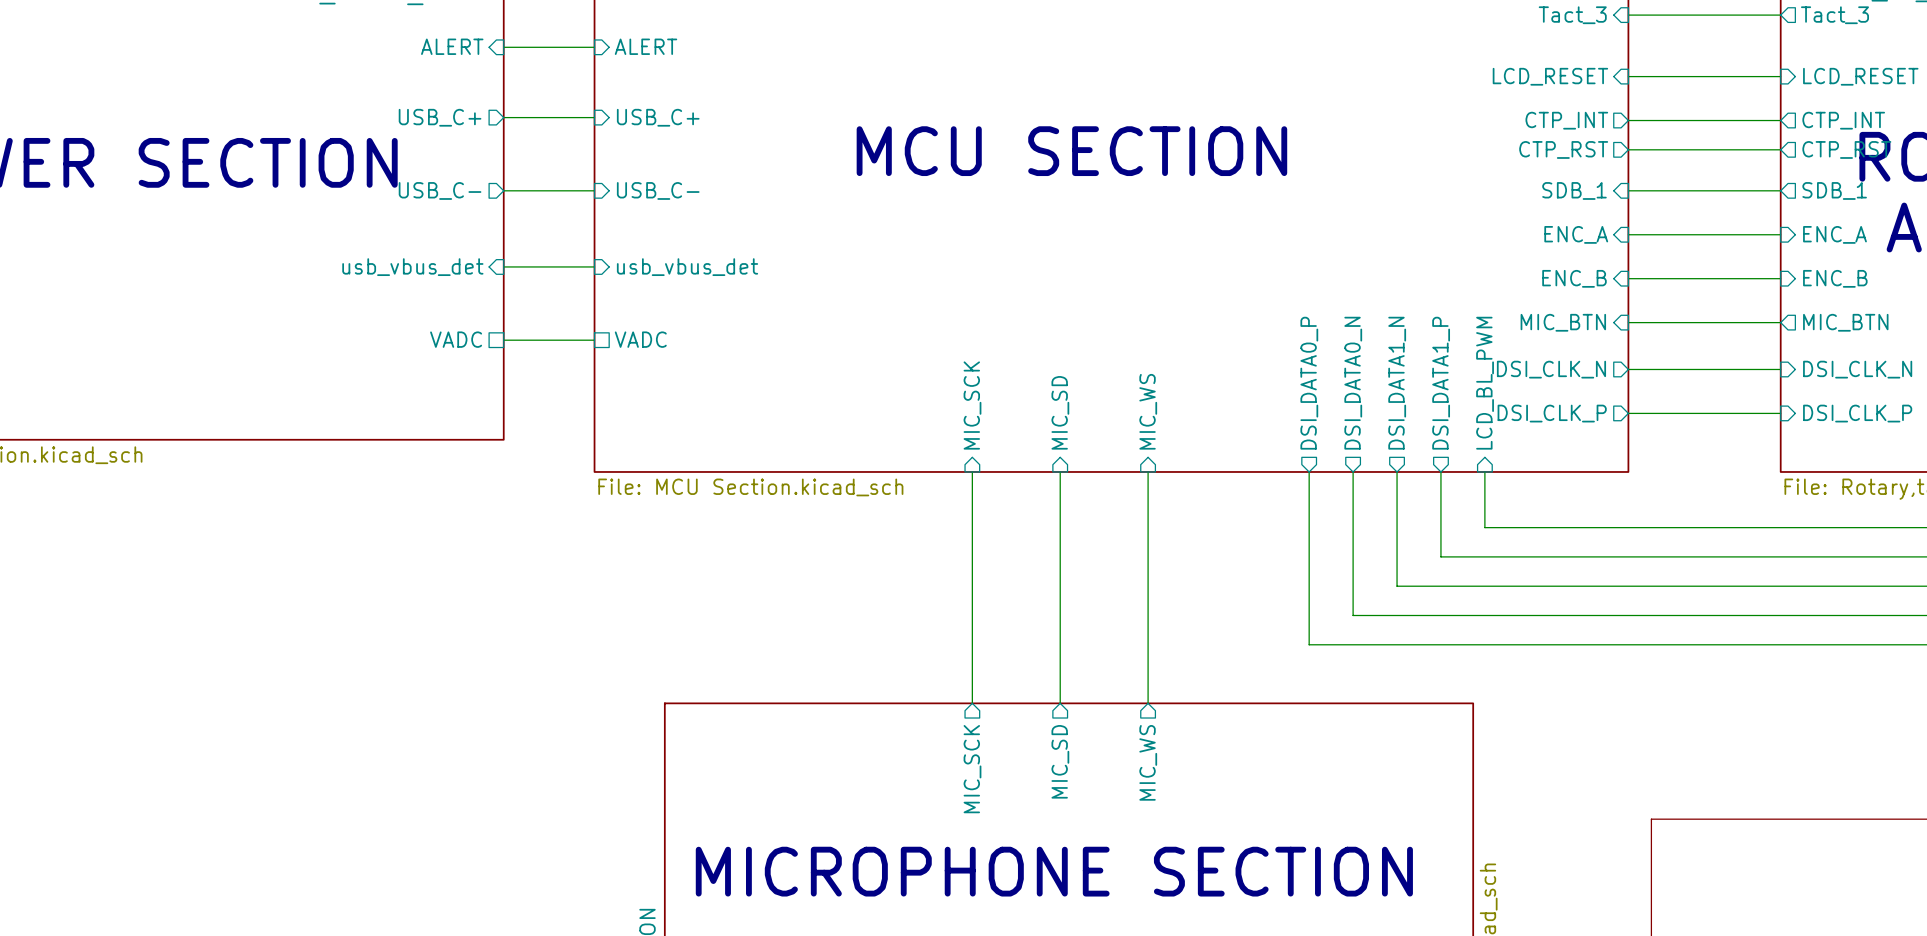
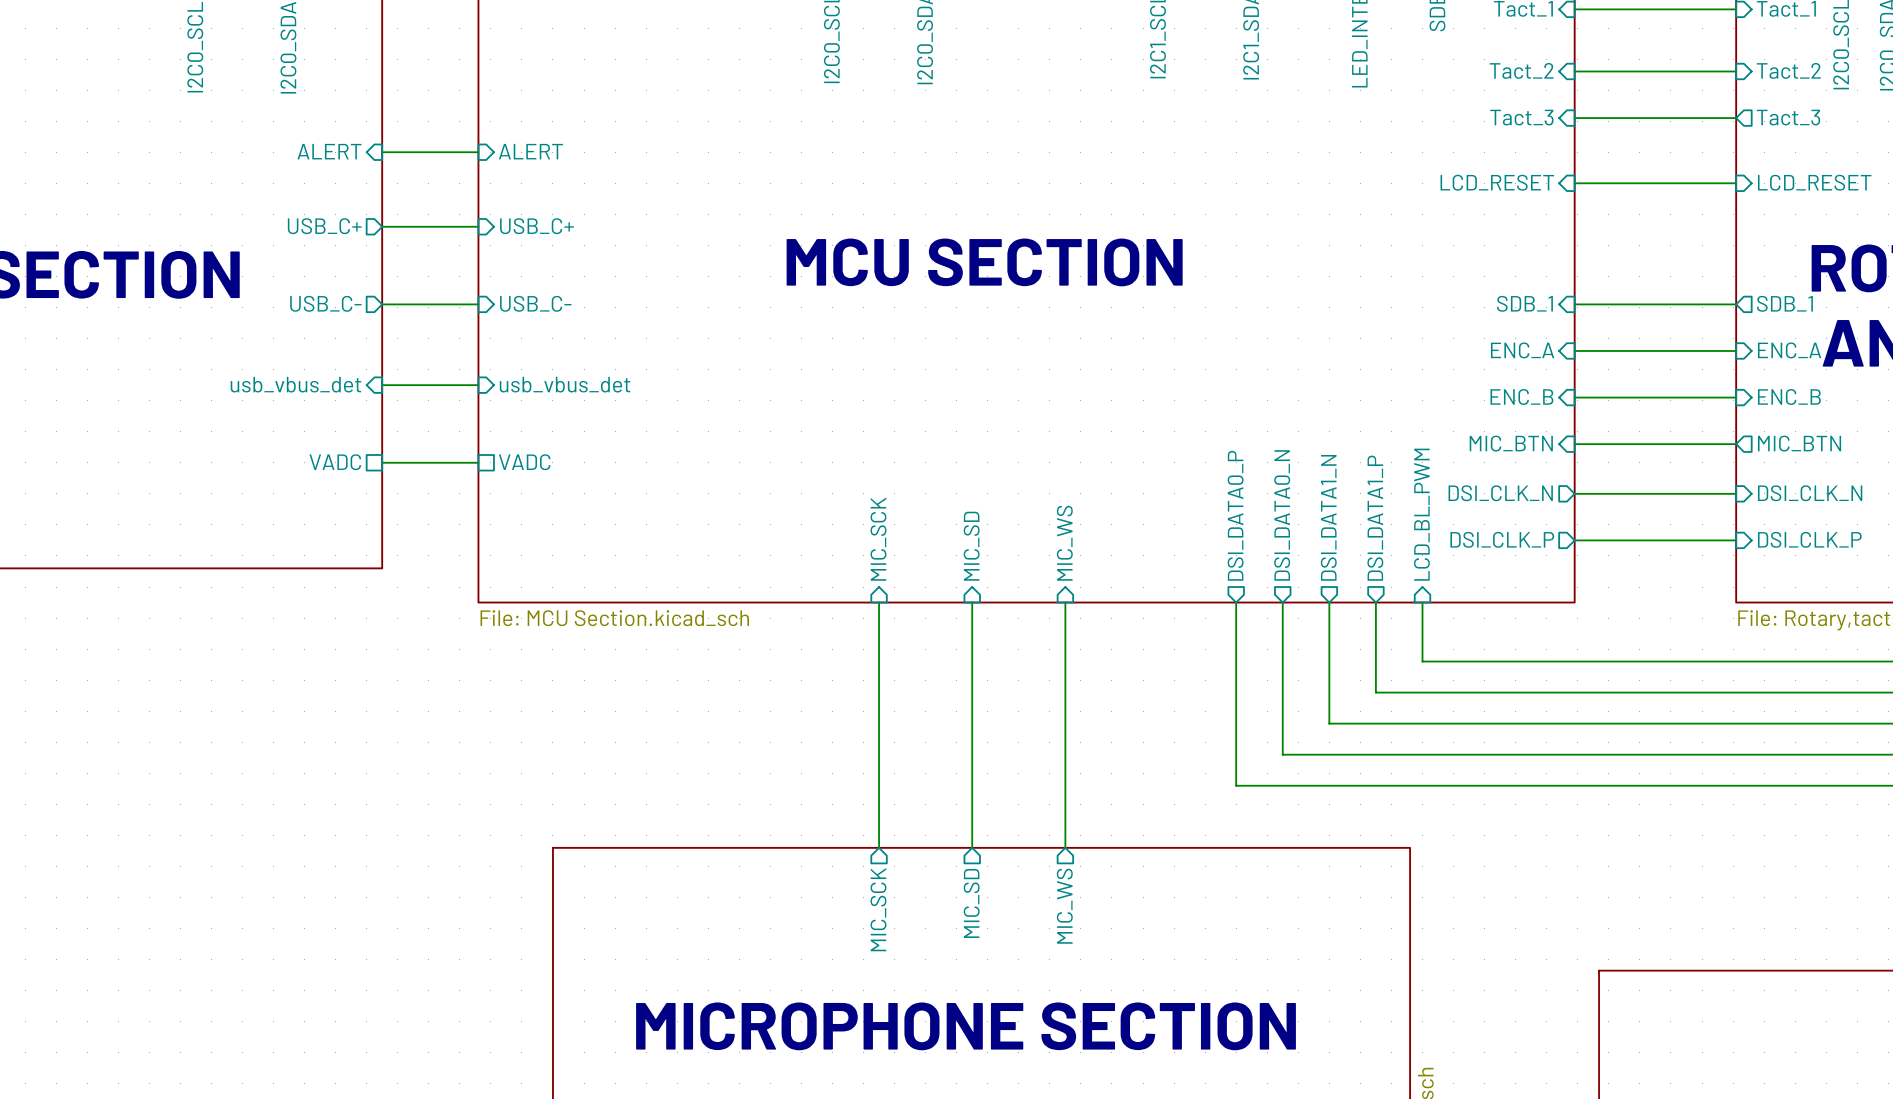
sheet pin: CTP_INT (1566, 120) -> none
wire: (1628, 120) (1780, 120) -> none
sheet pin: CTP_INT (1843, 120) -> none
sheet pin: CTP_RST (1563, 149) -> none
wire: (1628, 149) (1780, 149) -> none
sheet pin: CTP_RST (1846, 149) -> none

